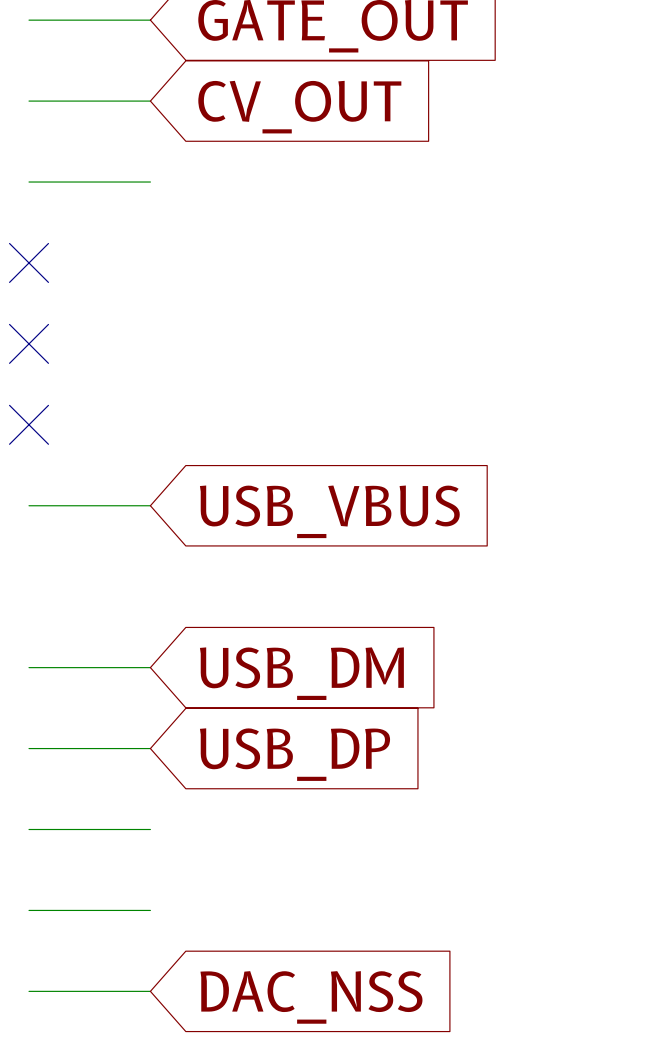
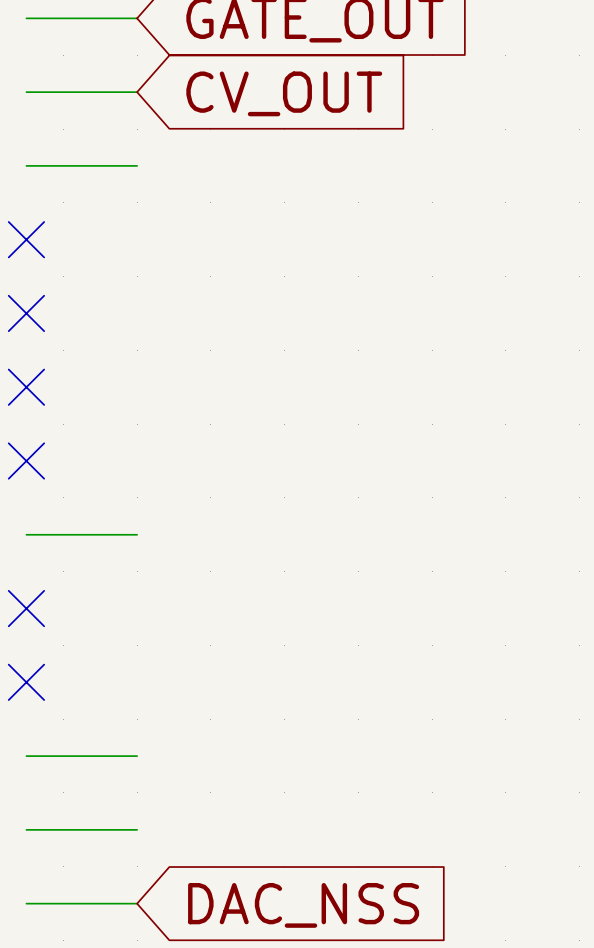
wire: (29, 505) (150, 505) -> (26, 534) (137, 534)
no-connect mark: none -> (26, 461)
global label: USB_VBUS (329, 511) -> none
wire: (29, 667) (150, 667) -> none
no-connect mark: none -> (26, 608)
global label: USB_DM (301, 673) -> none
wire: (29, 748) (150, 748) -> none
no-connect mark: none -> (26, 682)
global label: USB_DP (294, 754) -> none

